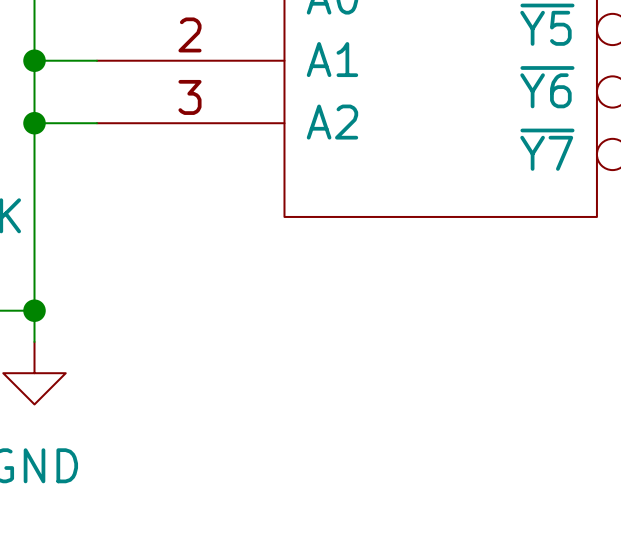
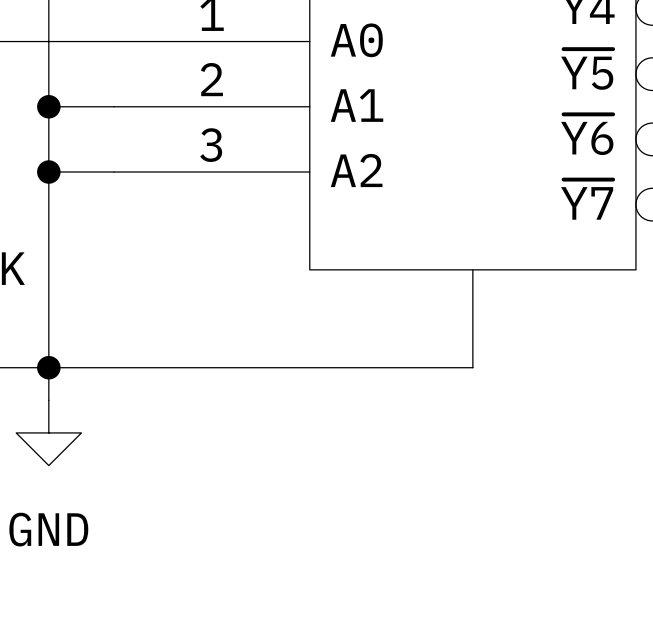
wire: none -> (472, 269) (472, 367) (48, 367)

